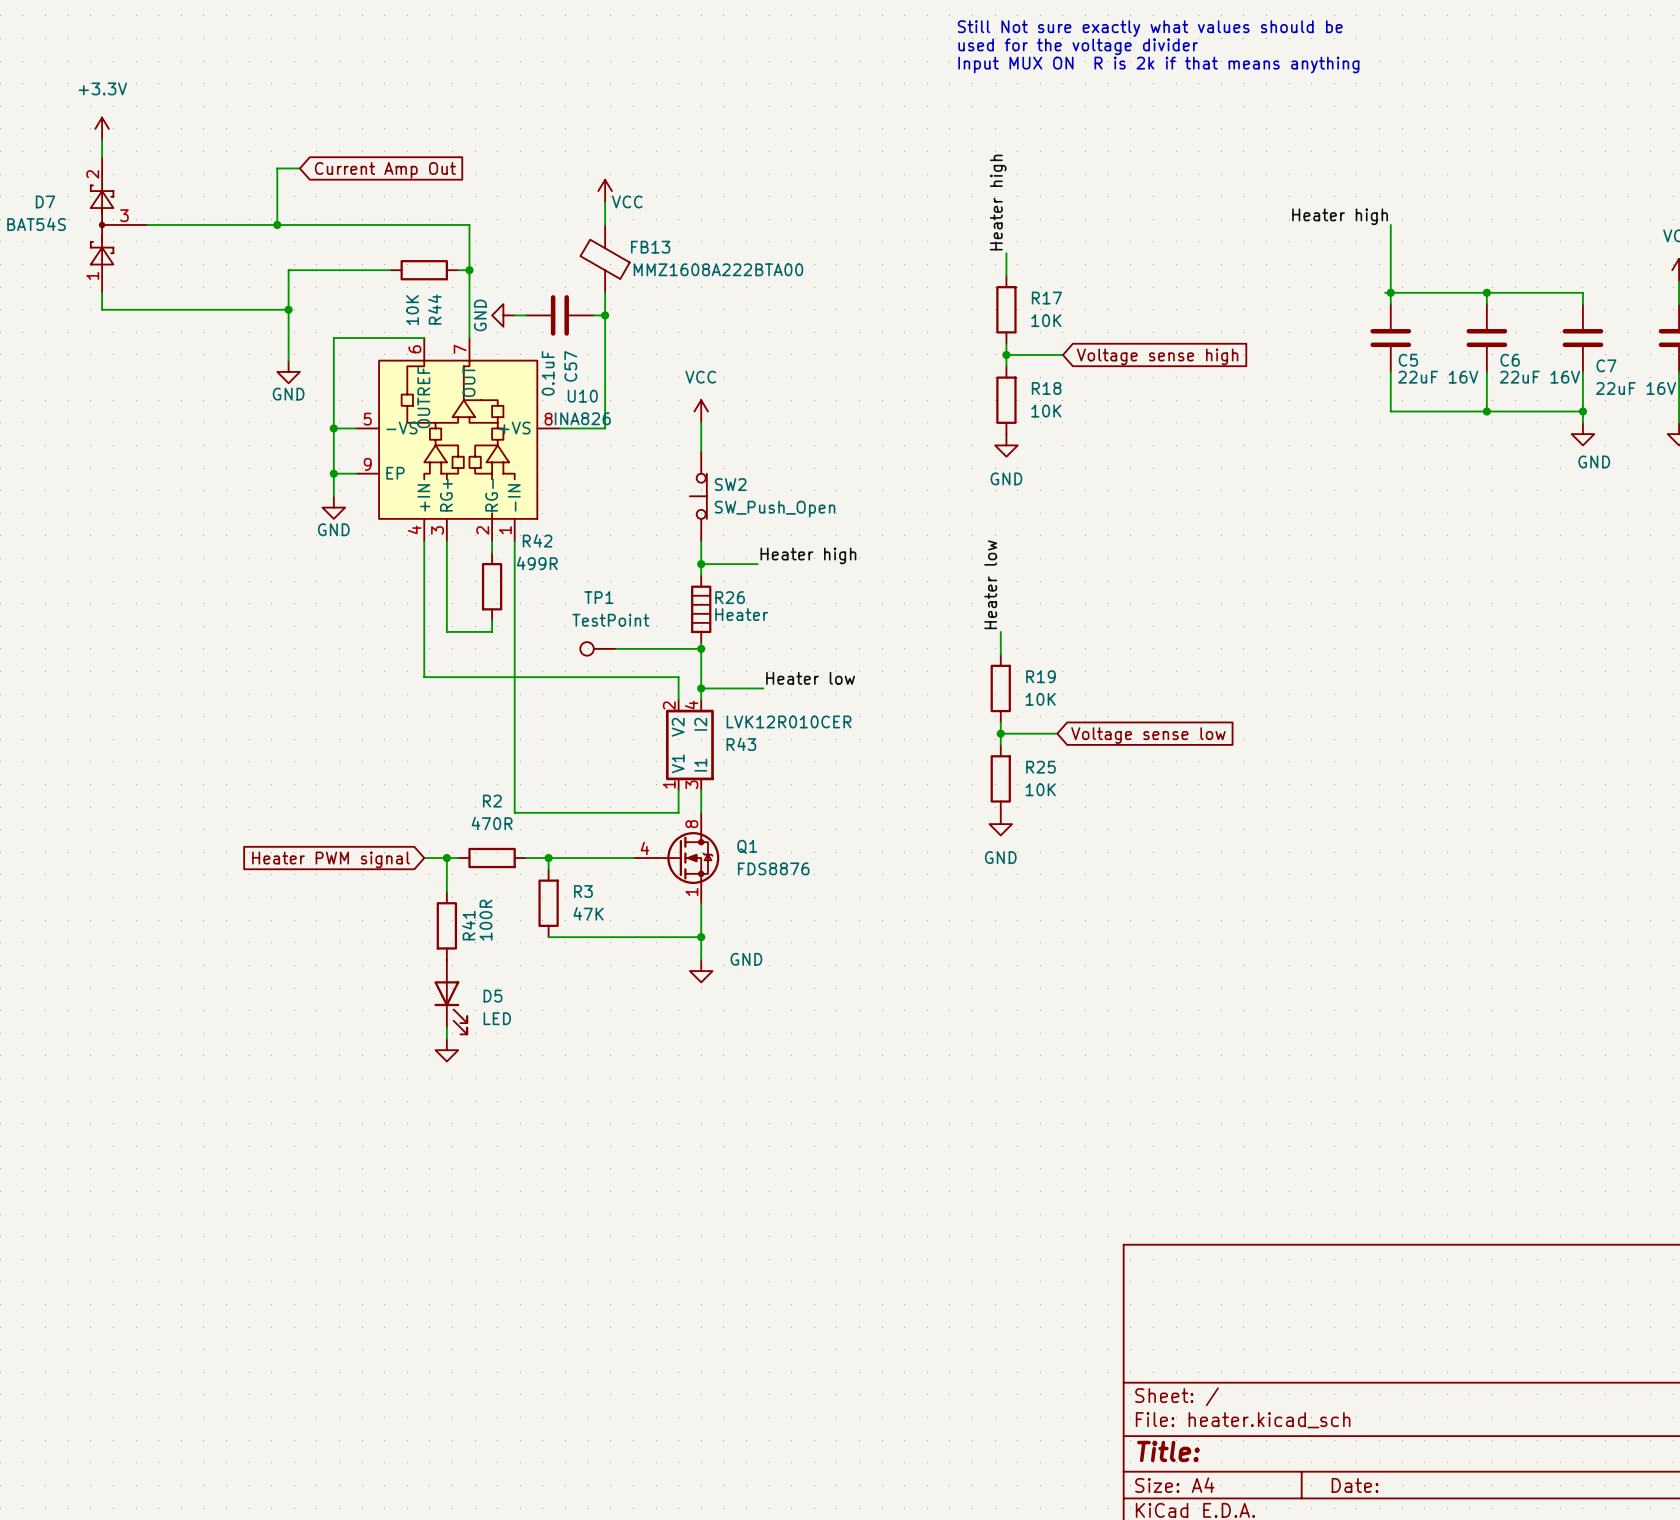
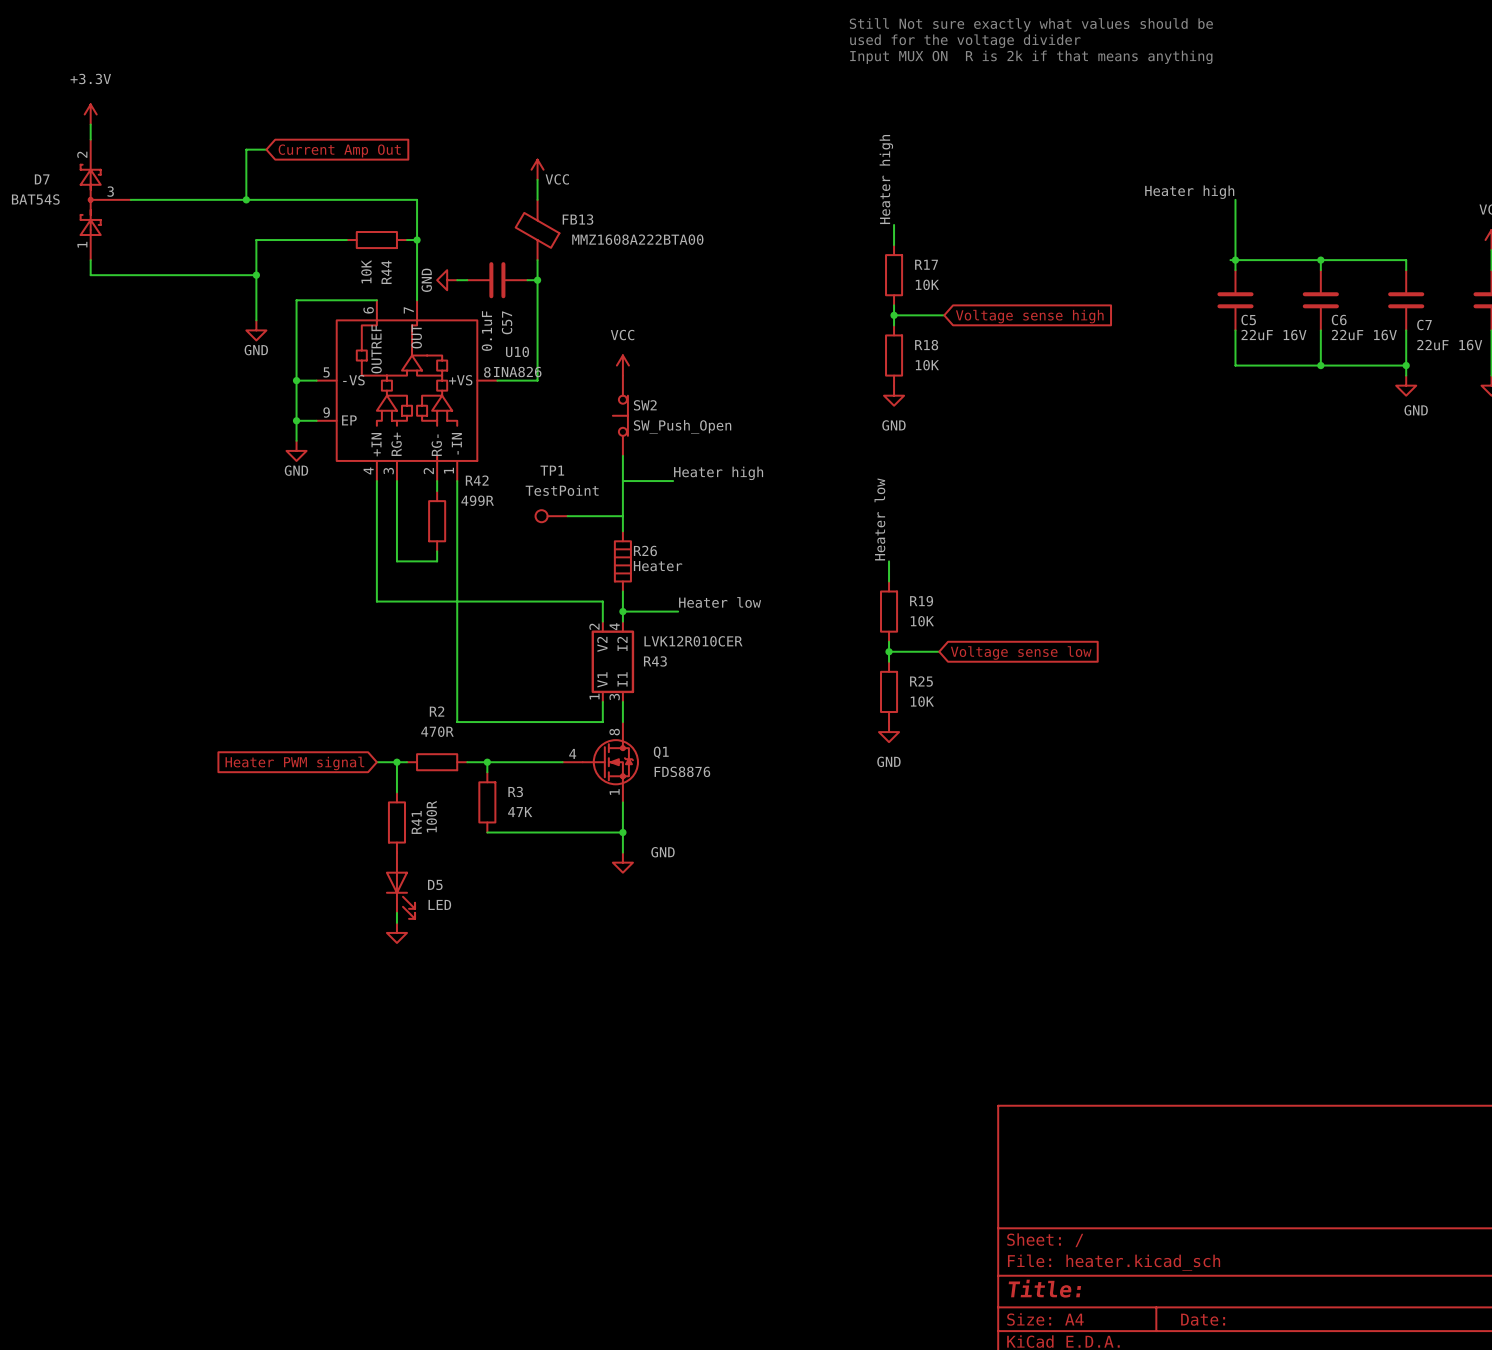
SW2 position: (698, 496) -> (620, 415)
wire: none -> (622, 455) (622, 481) (673, 481)
label position: Heater high (808, 555) -> Heater high (718, 473)
wire: (701, 564) (757, 564) -> none
junction: (701, 564) -> none
wire: none -> (567, 516) (622, 516)
R26 position: (701, 609) -> (622, 561)
TP1 position: (598, 648) -> (551, 516)
wire: (616, 648) (701, 648) -> none
junction: (701, 648) -> none

